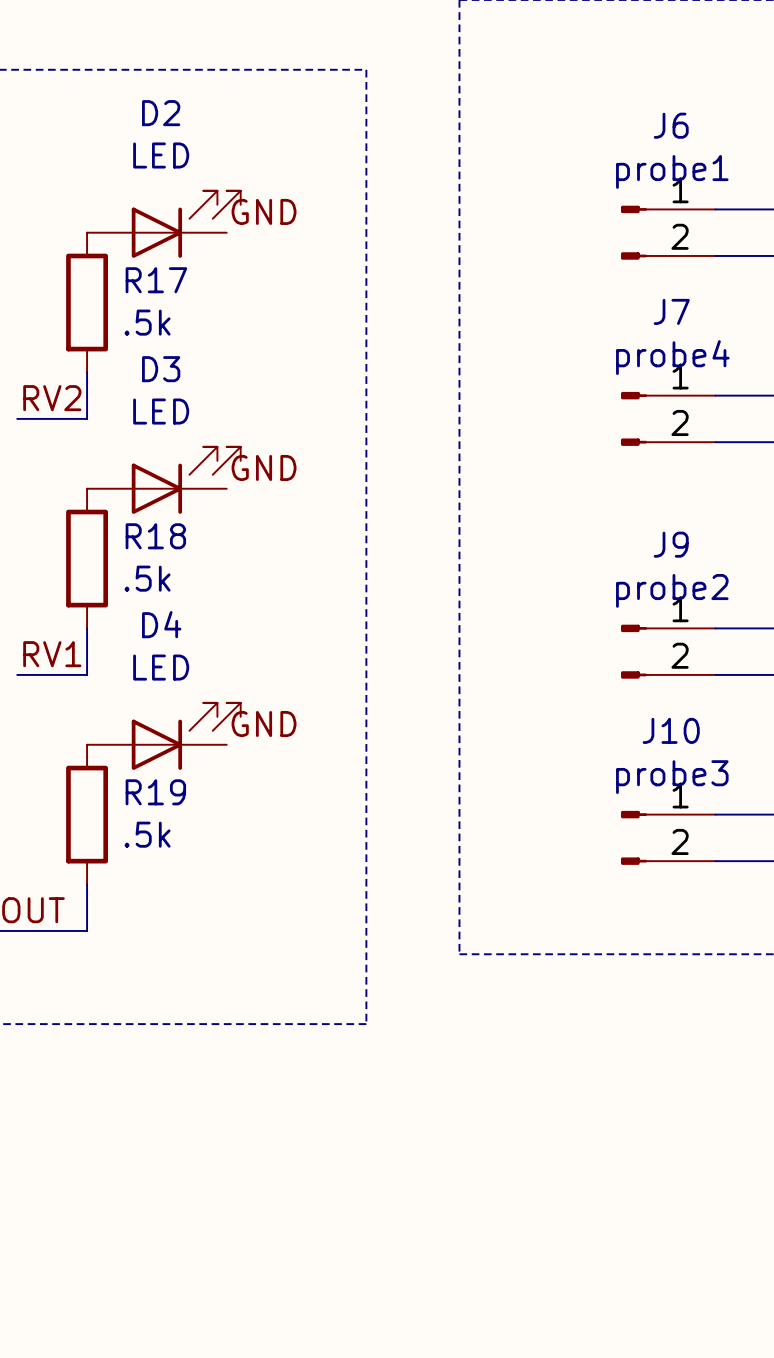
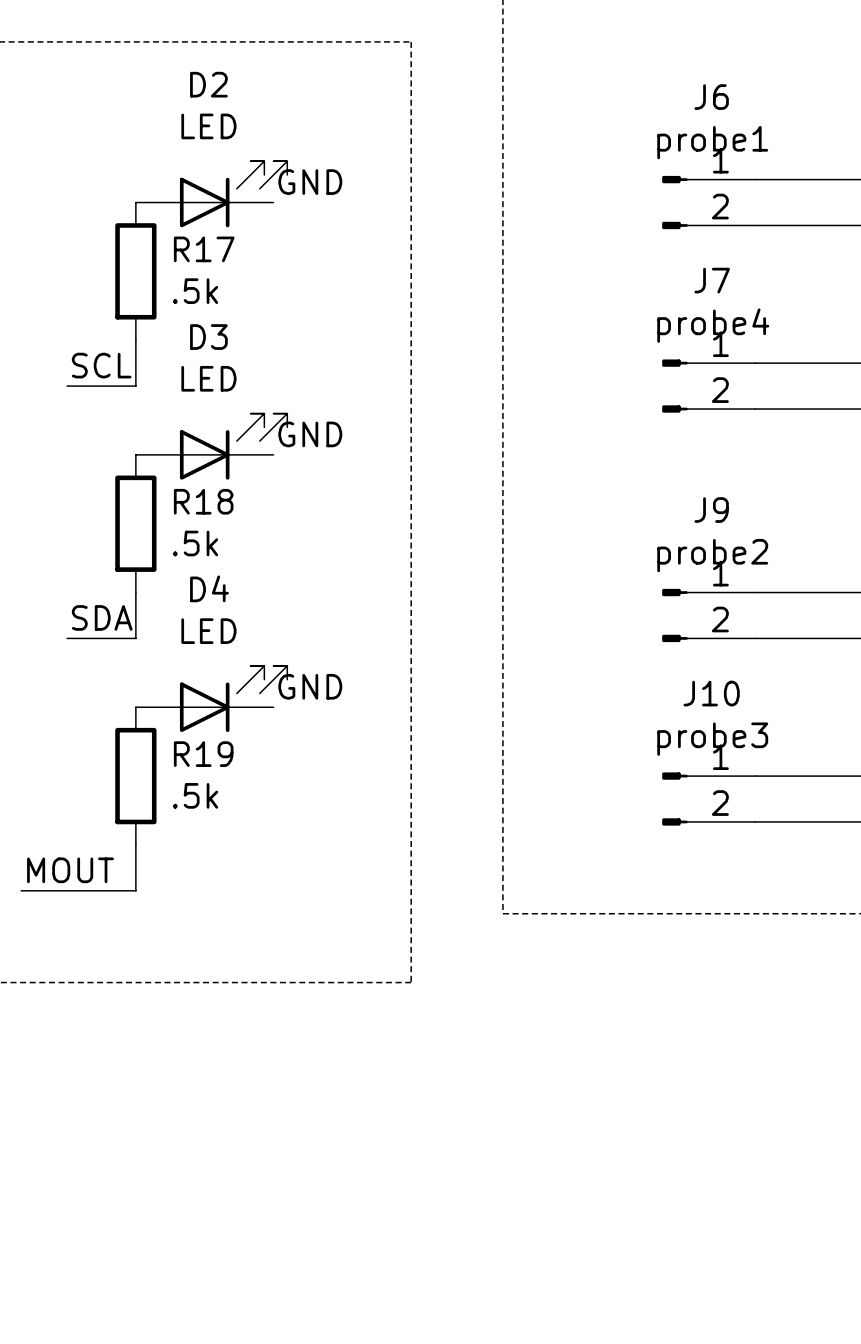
label: RV2 (52, 398) -> SCL (101, 365)
label: RV1 (52, 654) -> SDA (102, 617)

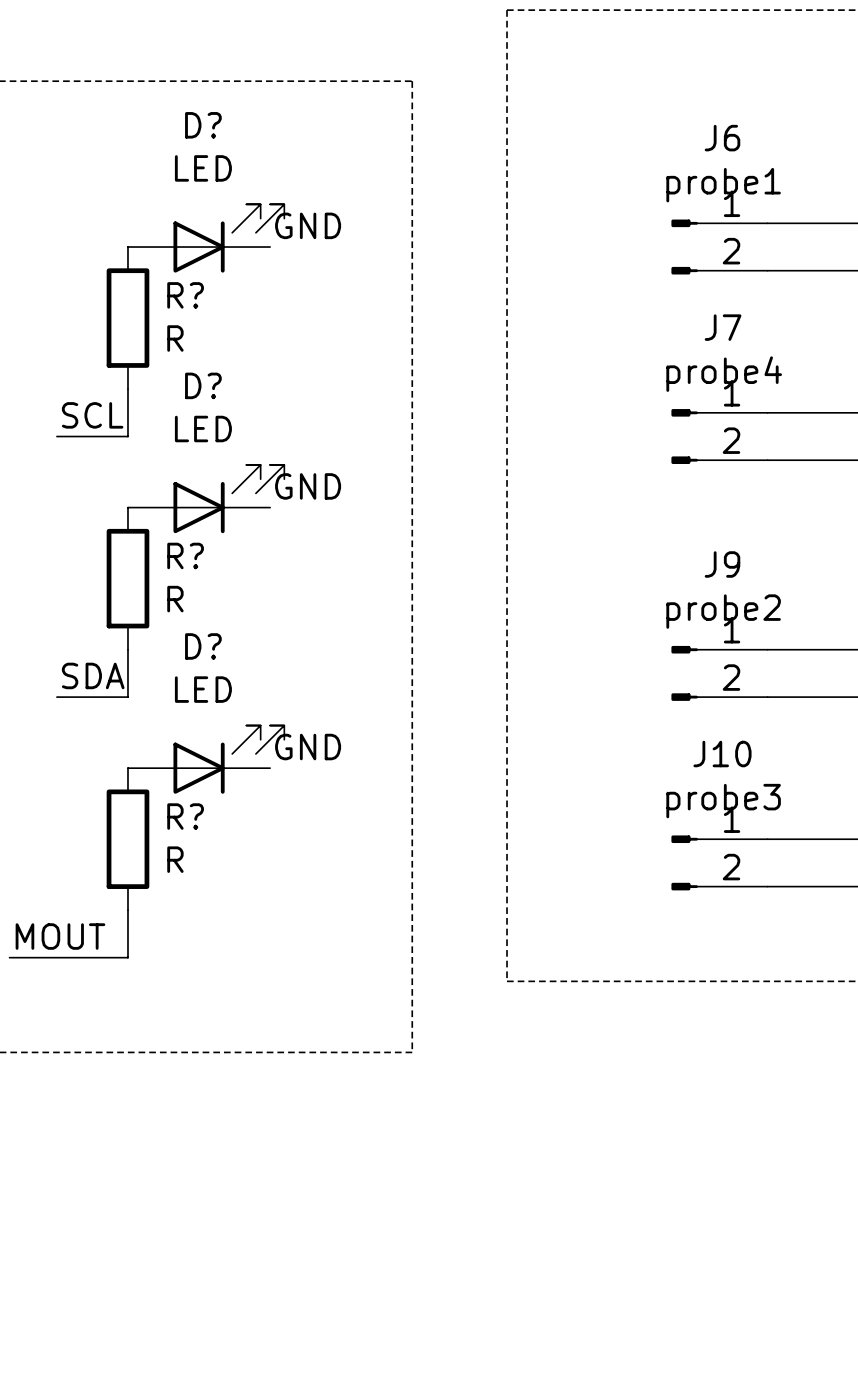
D2 name: D2 (208, 84) -> D? (203, 125)
R17 name: R17 (204, 249) -> R? (185, 295)
R17 value: .5k (195, 291) -> R (175, 338)
D3 name: D3 (208, 337) -> D? (203, 385)
R18 name: R18 (203, 501) -> R? (185, 555)
R18 value: .5k (195, 543) -> R (175, 599)
D4 name: D4 (209, 588) -> D? (203, 646)
R19 name: R19 (203, 754) -> R? (185, 816)
R19 value: .5k (195, 795) -> R (175, 859)

